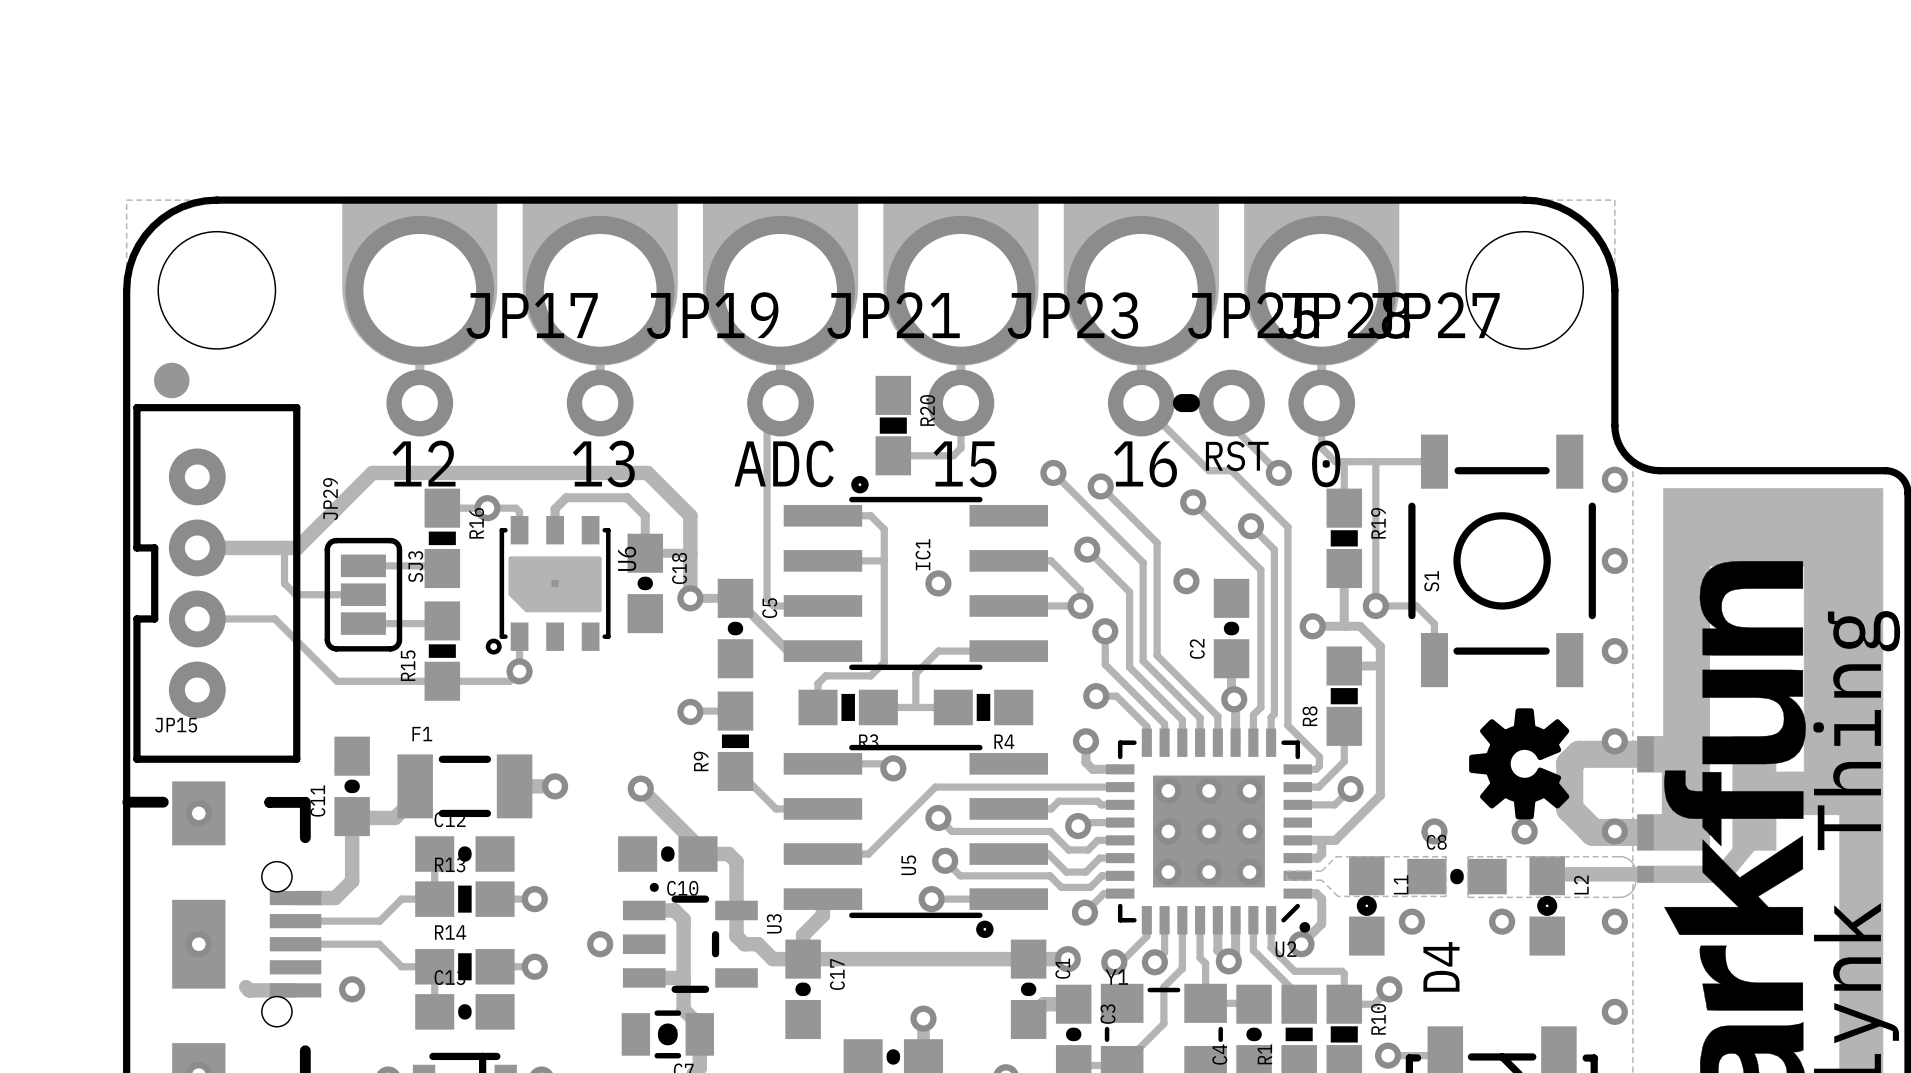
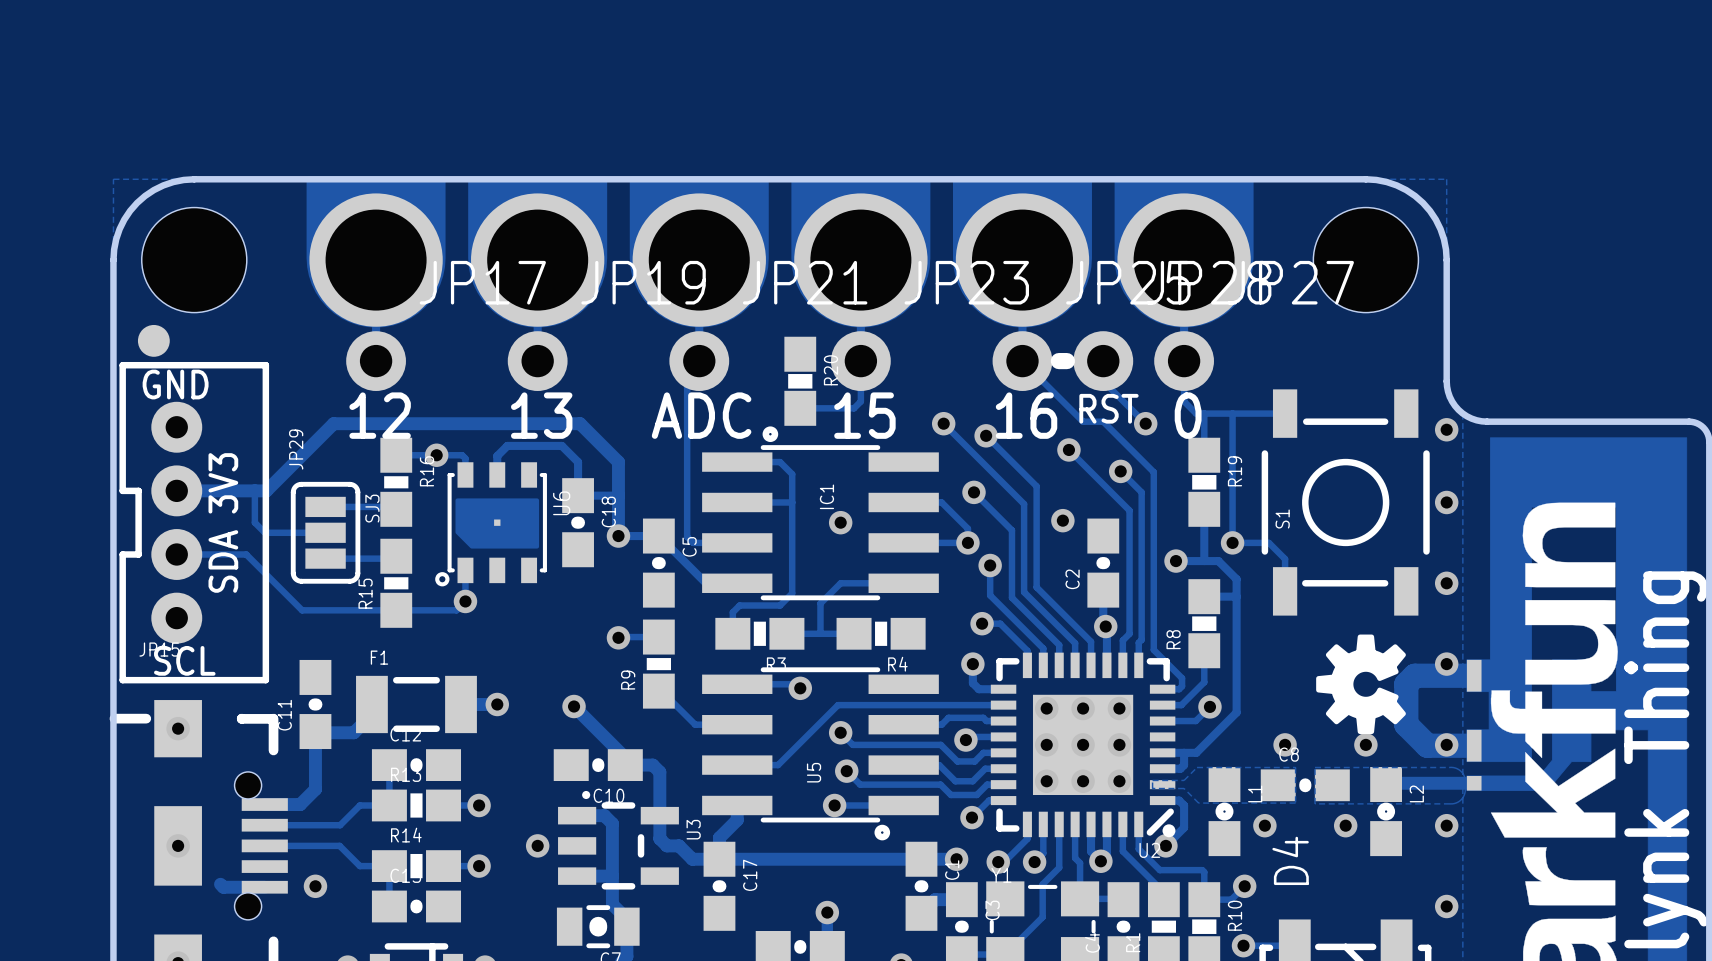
text: none -> GND (175, 384)
text: none -> 3V3 (223, 483)
text: none -> SDA (223, 561)
U2 footprint: [1106, 728, 1312, 935] -> [990, 652, 1176, 838]
text: none -> SCL (184, 660)

